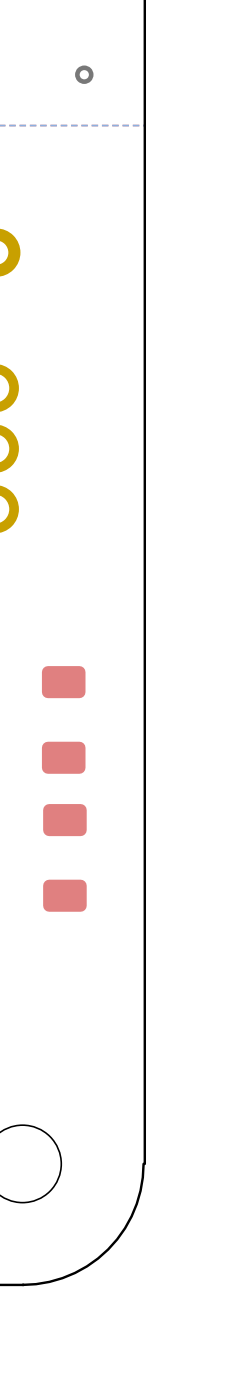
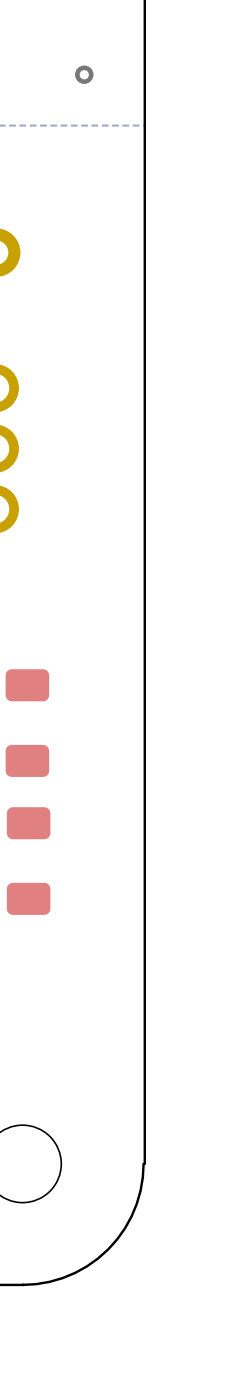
part position: (63, 719) -> (27, 723)
part position: (64, 857) -> (28, 861)

